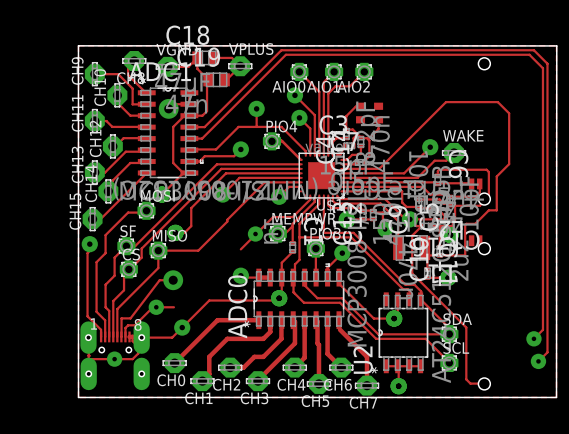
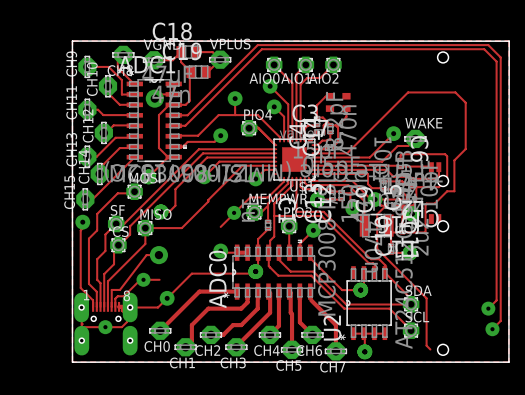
track: (470, 383) (484, 383) -> none

